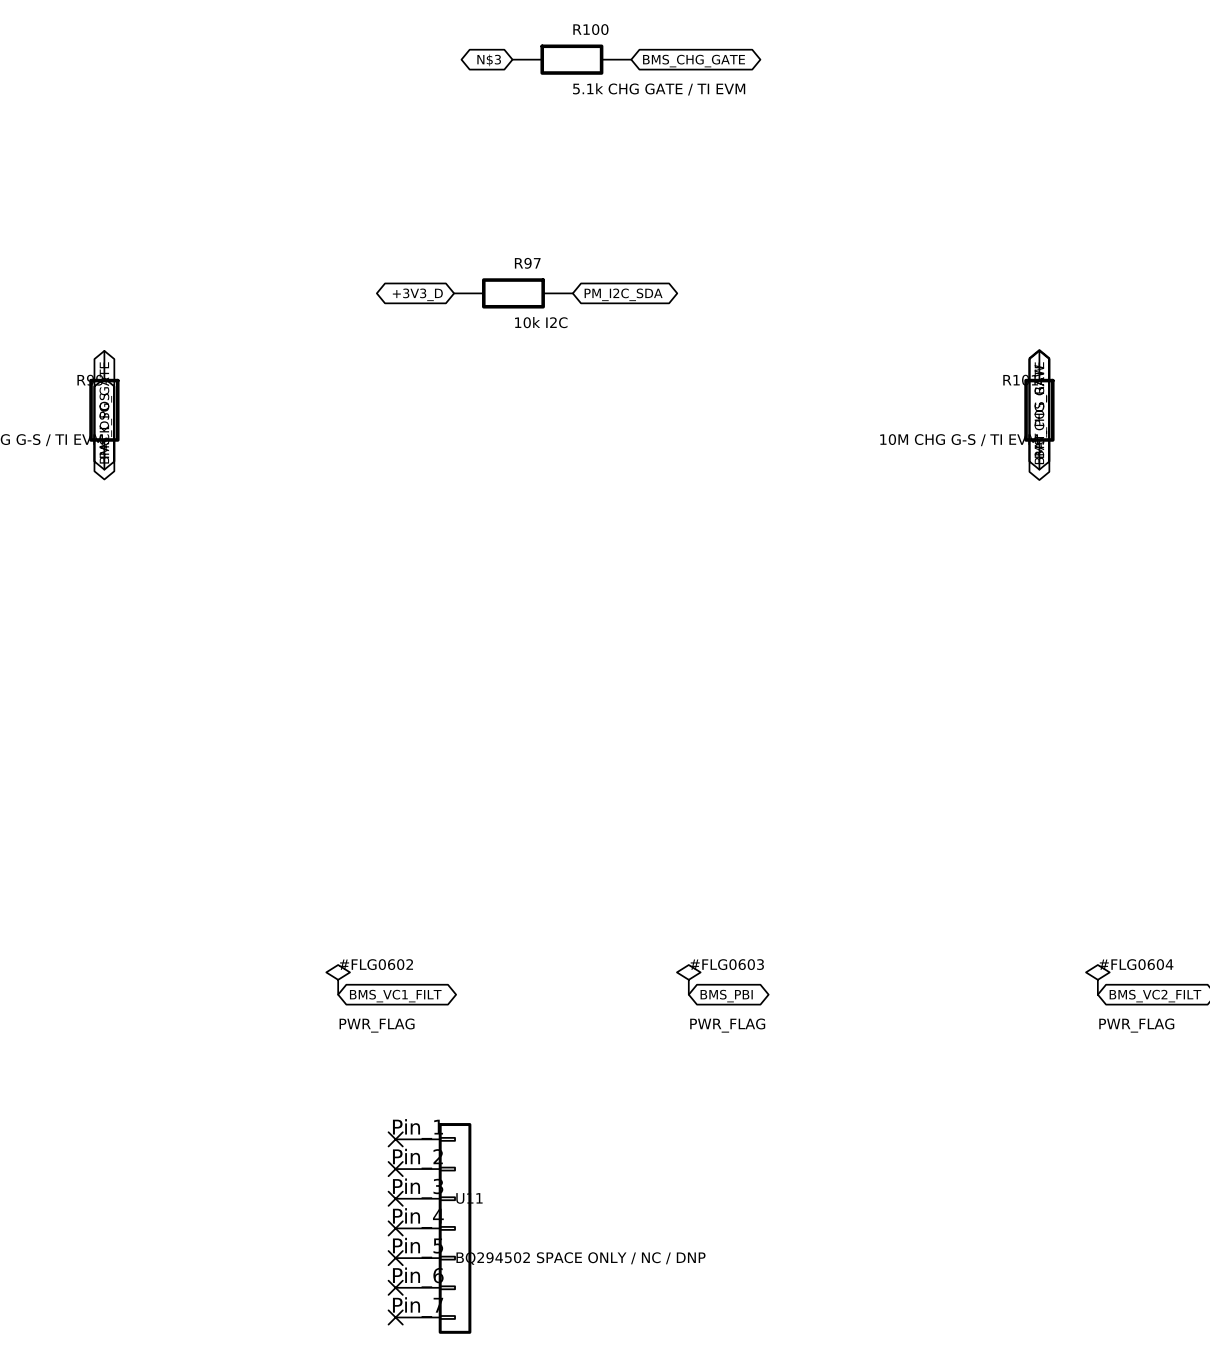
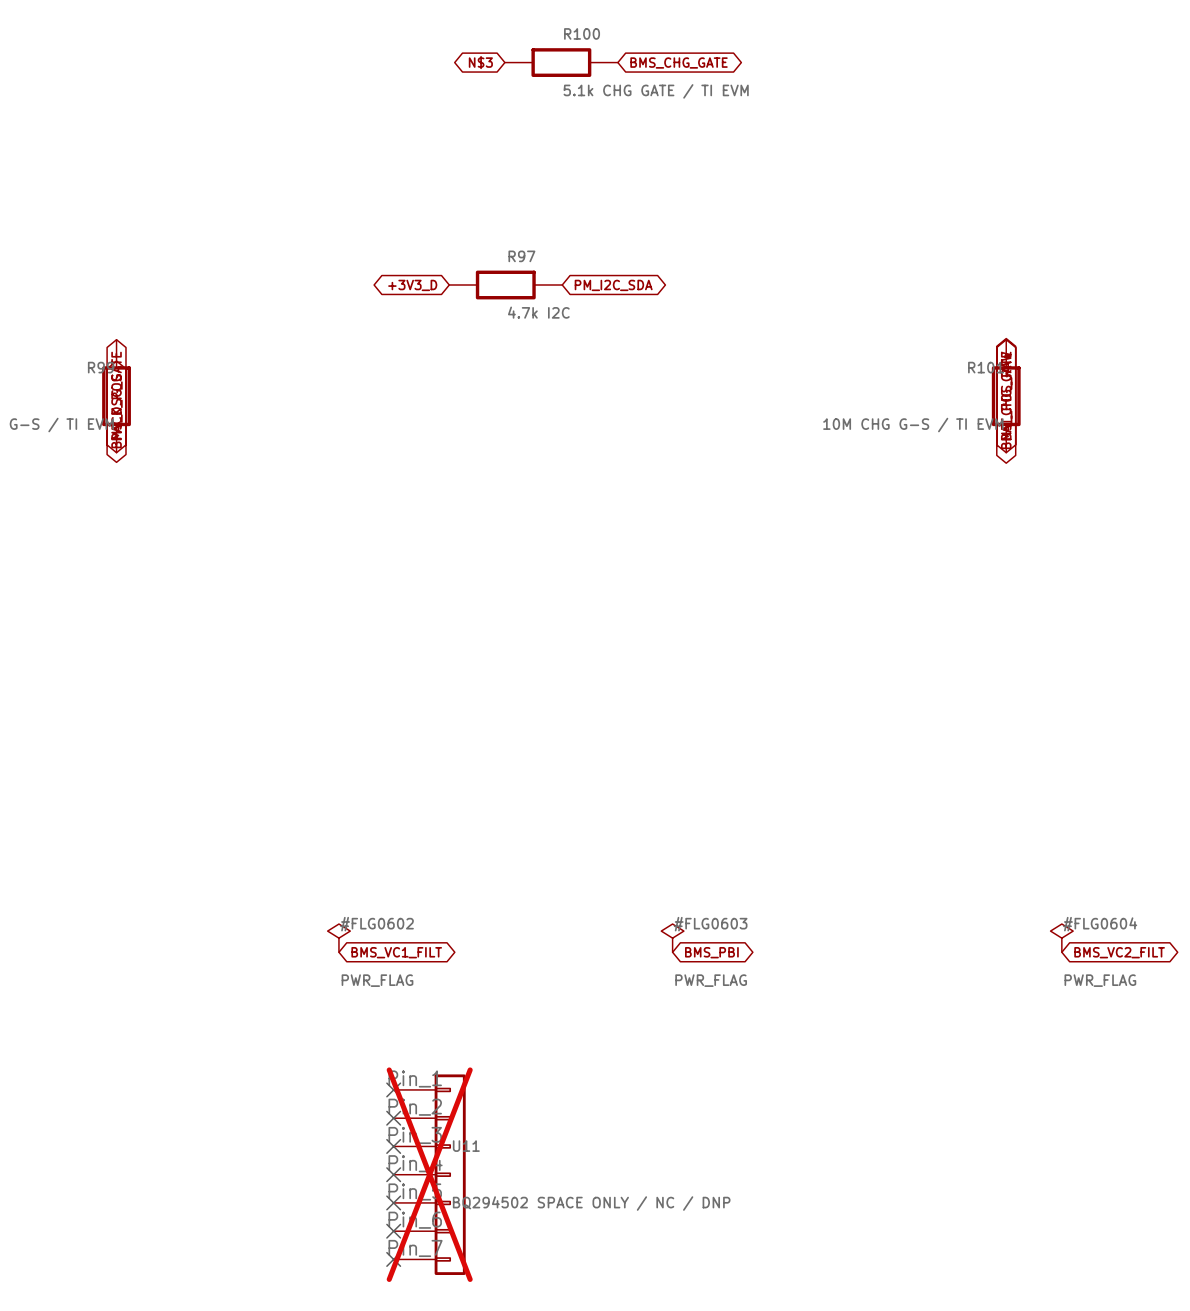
R97 value: 10k I2C (541, 322) -> 4.7k I2C (538, 312)
U11 do-not-place cross: none -> (429, 1174)

